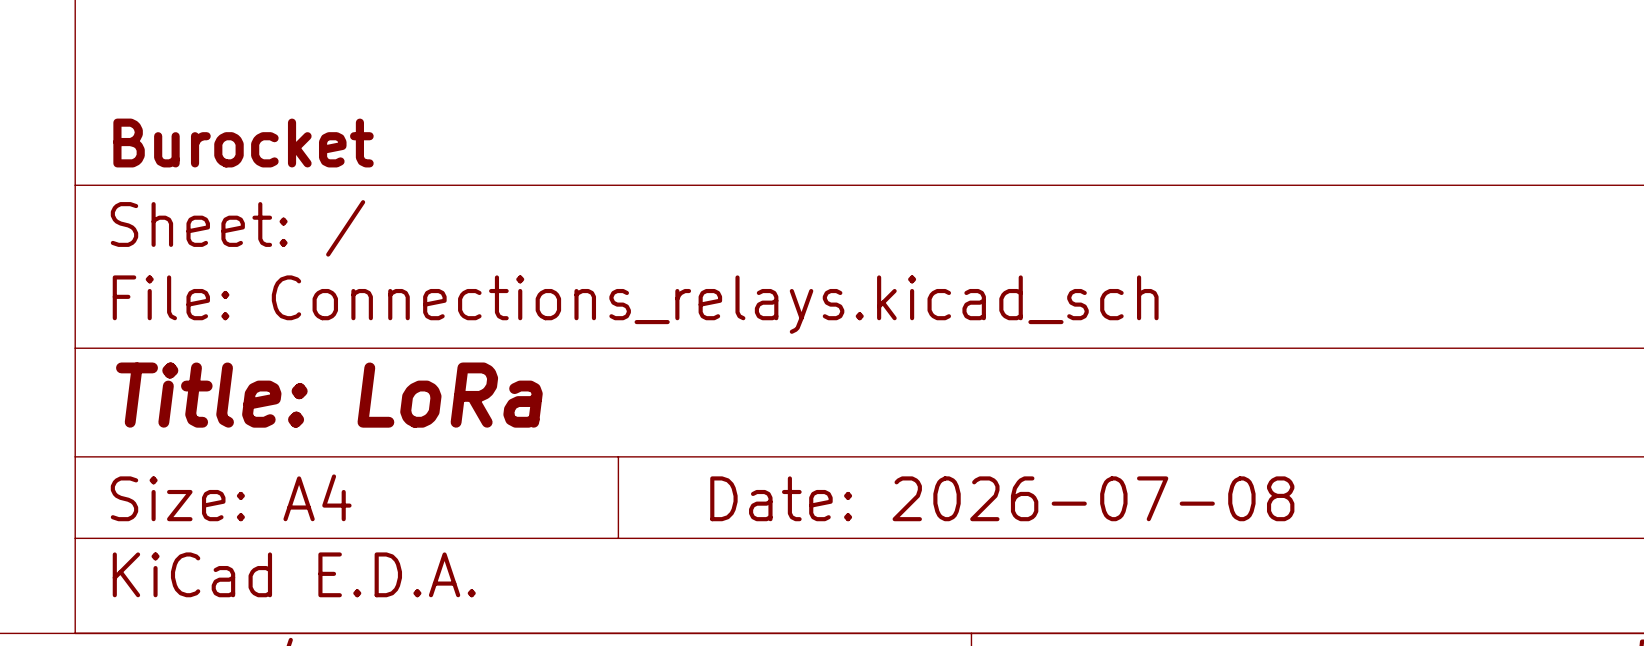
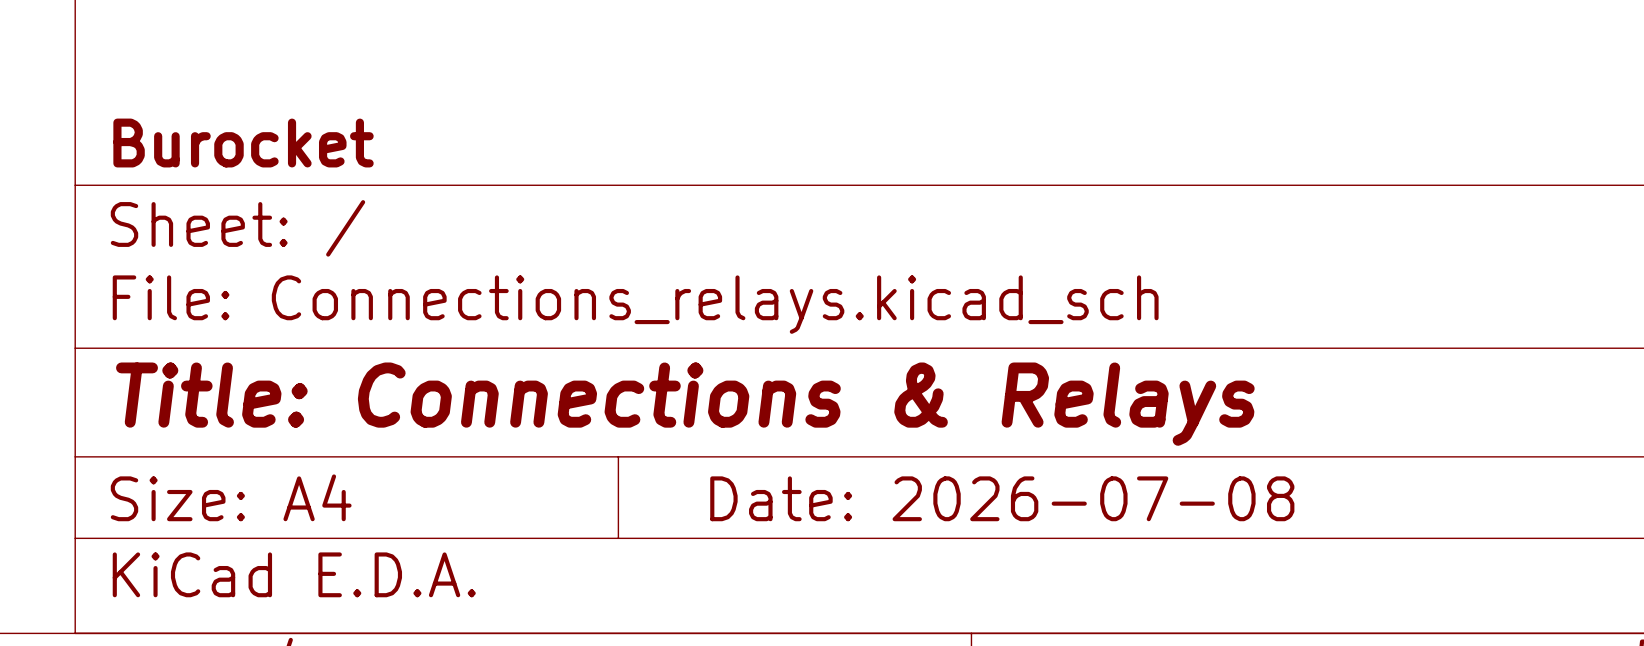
title block: Title: LoRa (329, 395) -> Title: Connections & Relays (685, 404)

